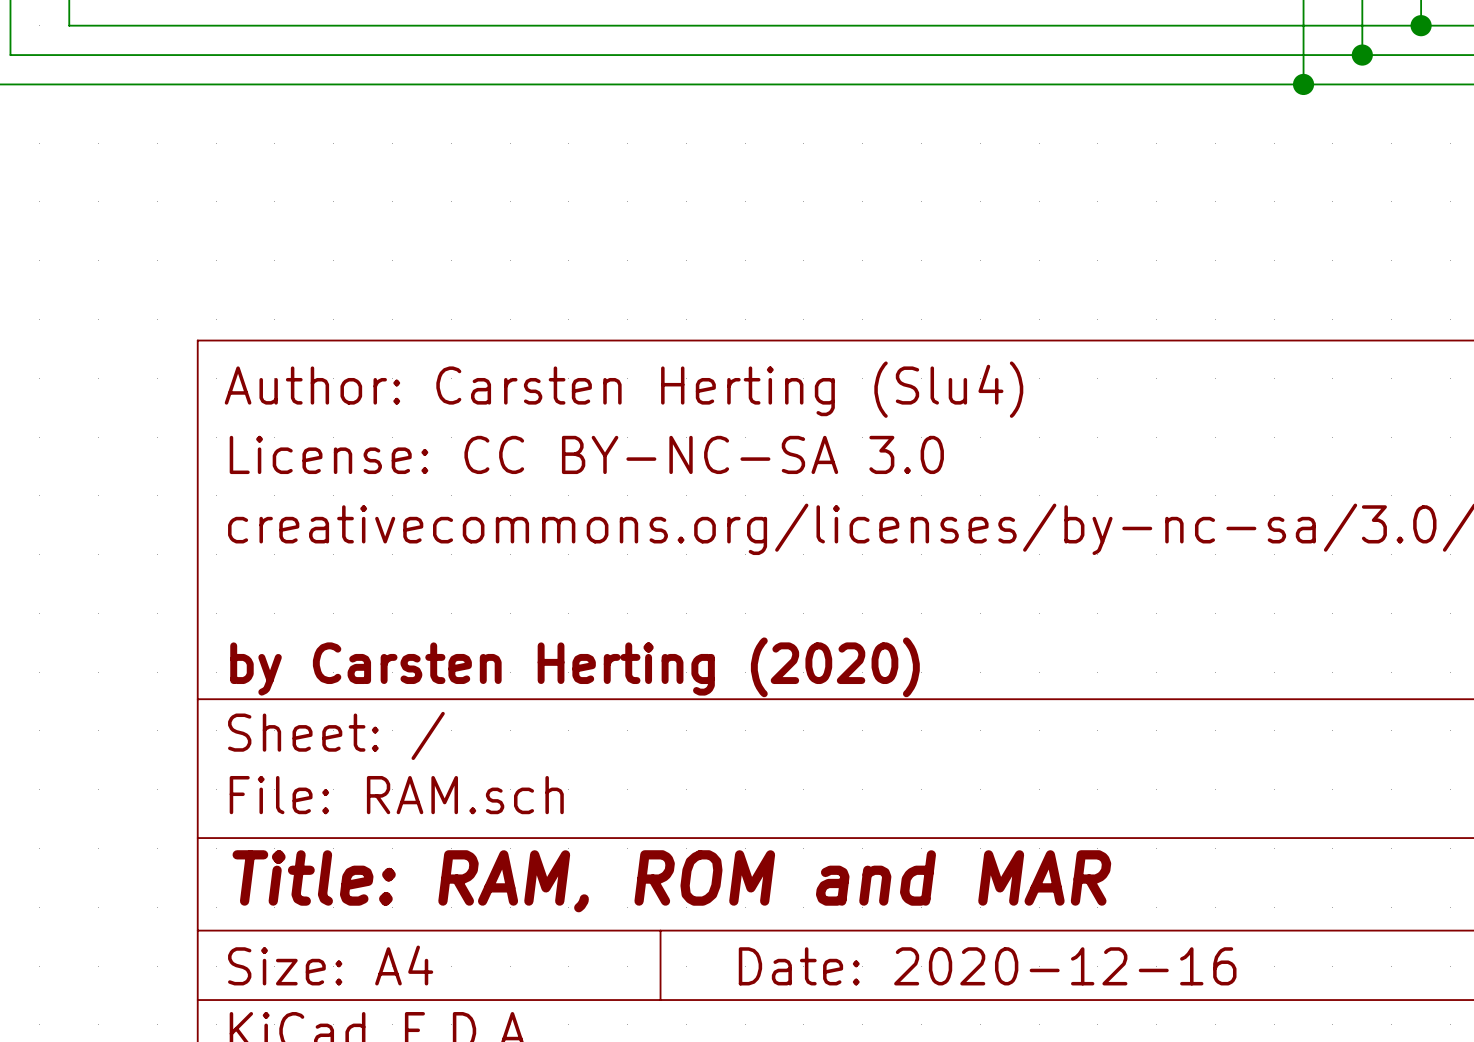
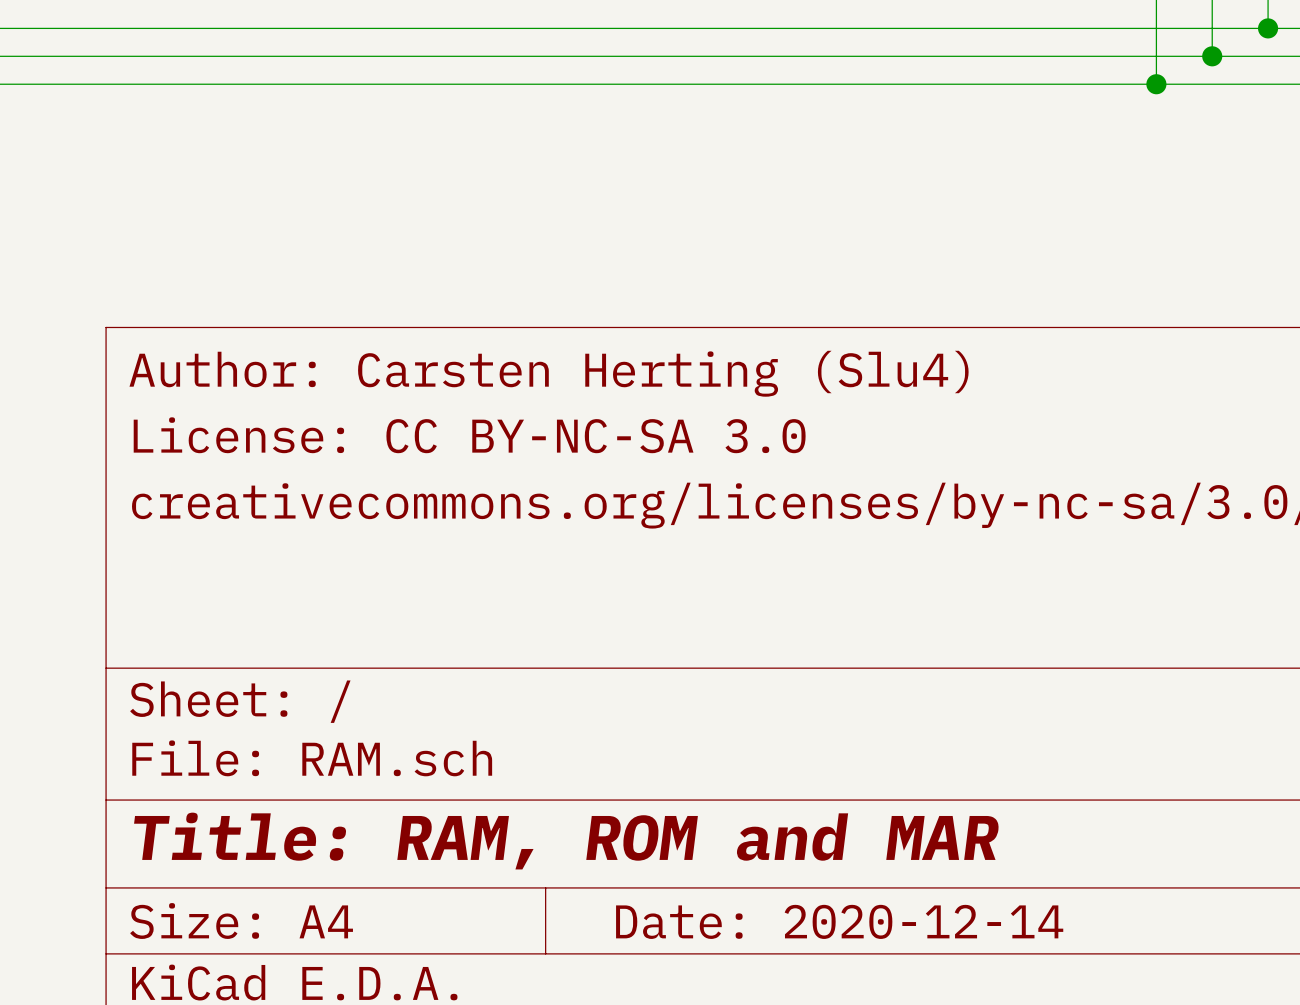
title block: by Carsten Herting (2020) (575, 667) -> none
title block: Date: 2020-12-16 (987, 966) -> Date: 2020-12-14 (839, 921)

